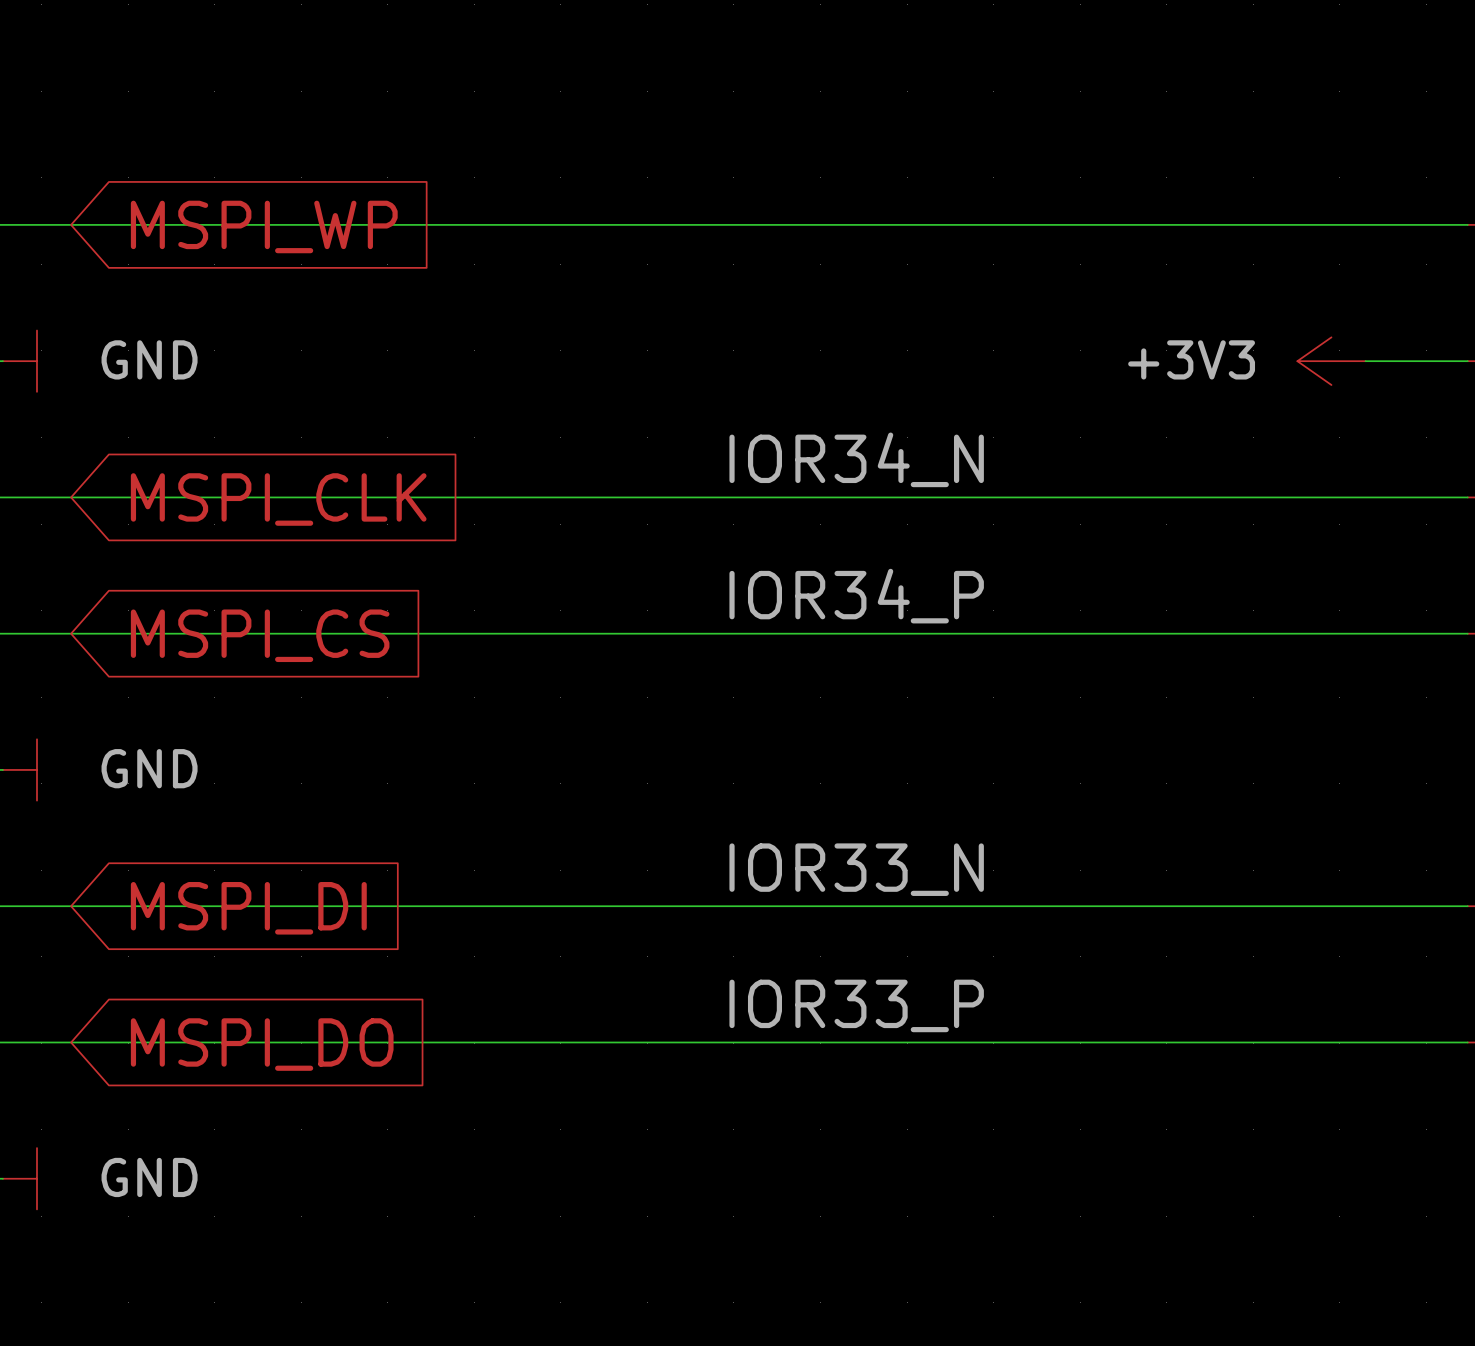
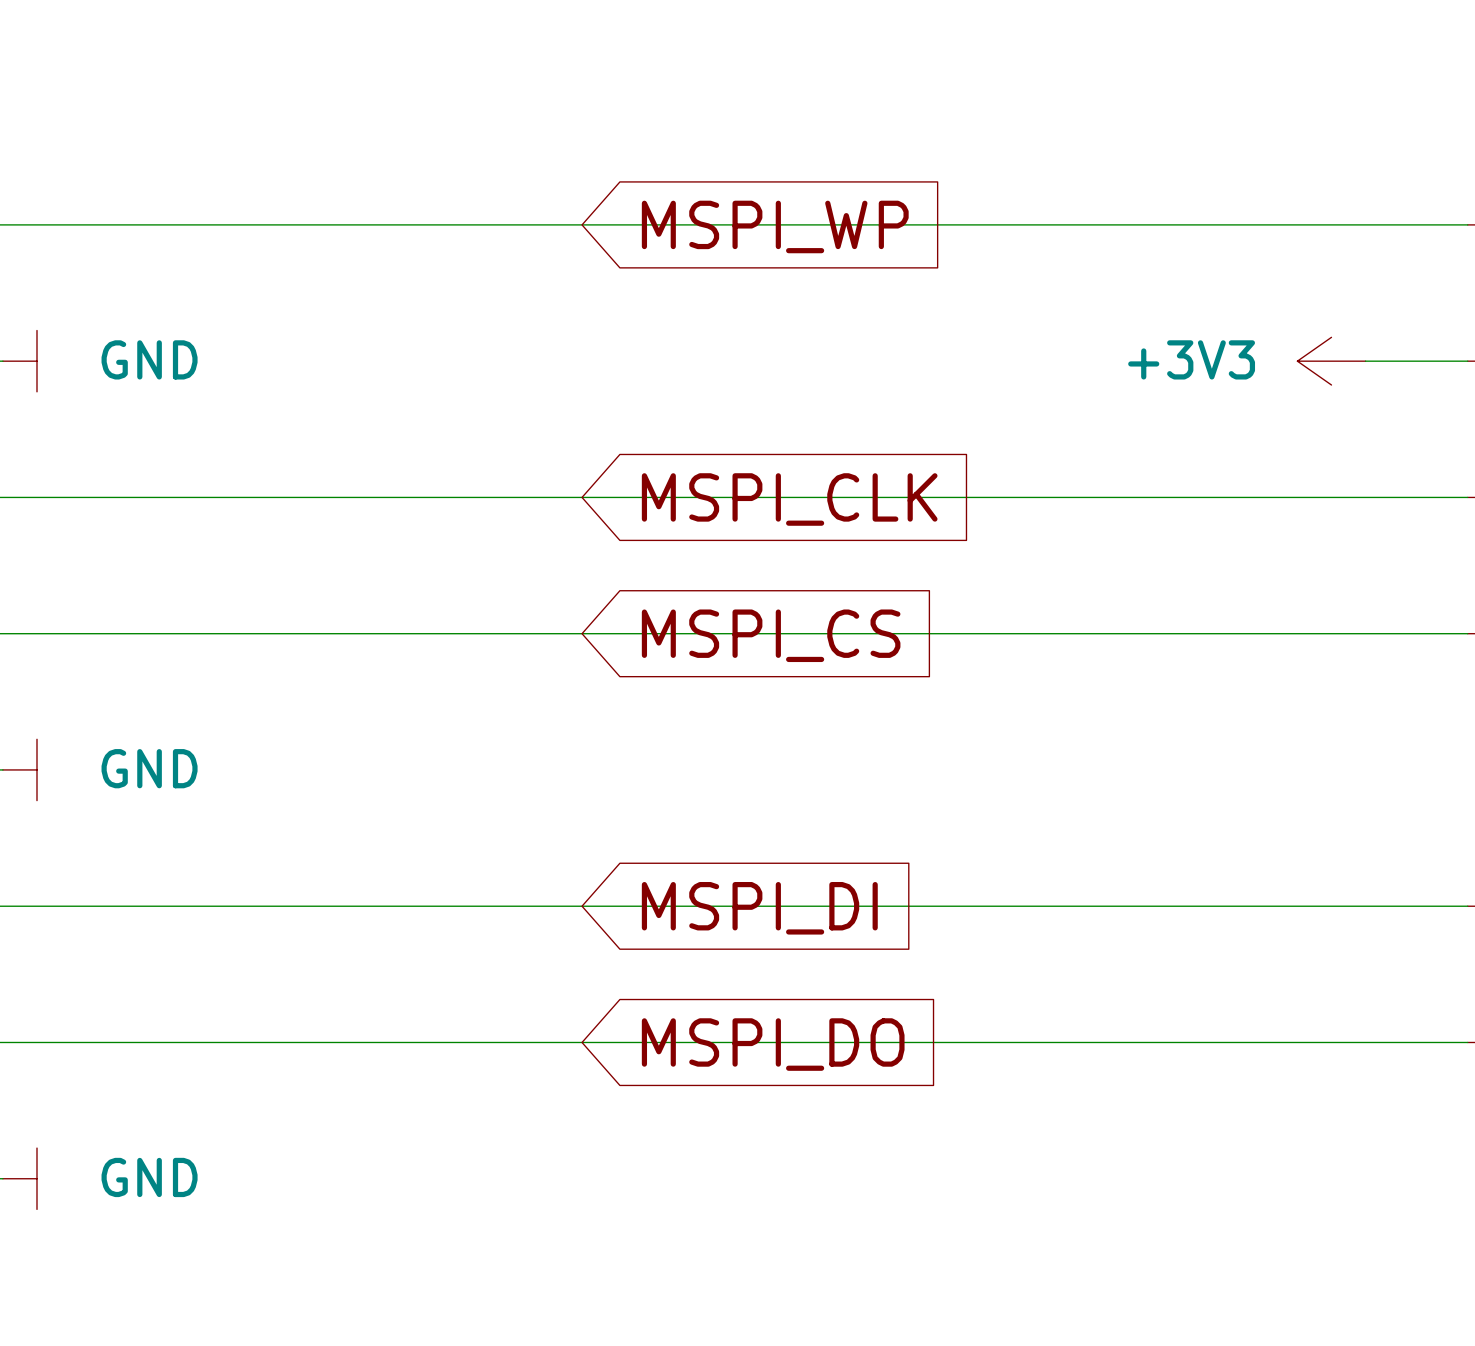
global label position: MSPI_WP (264, 226) -> MSPI_WP (775, 226)
label: IOR34_N (856, 459) -> none
global label position: MSPI_CLK (278, 499) -> MSPI_CLK (789, 499)
label: IOR34_P (856, 596) -> none
global label position: MSPI_CS (260, 635) -> MSPI_CS (771, 635)
label: IOR33_N (856, 869) -> none
global label position: MSPI_DI (248, 908) -> MSPI_DI (759, 908)
label: IOR33_P (856, 1005) -> none
global label position: MSPI_DO (262, 1044) -> MSPI_DO (773, 1044)

